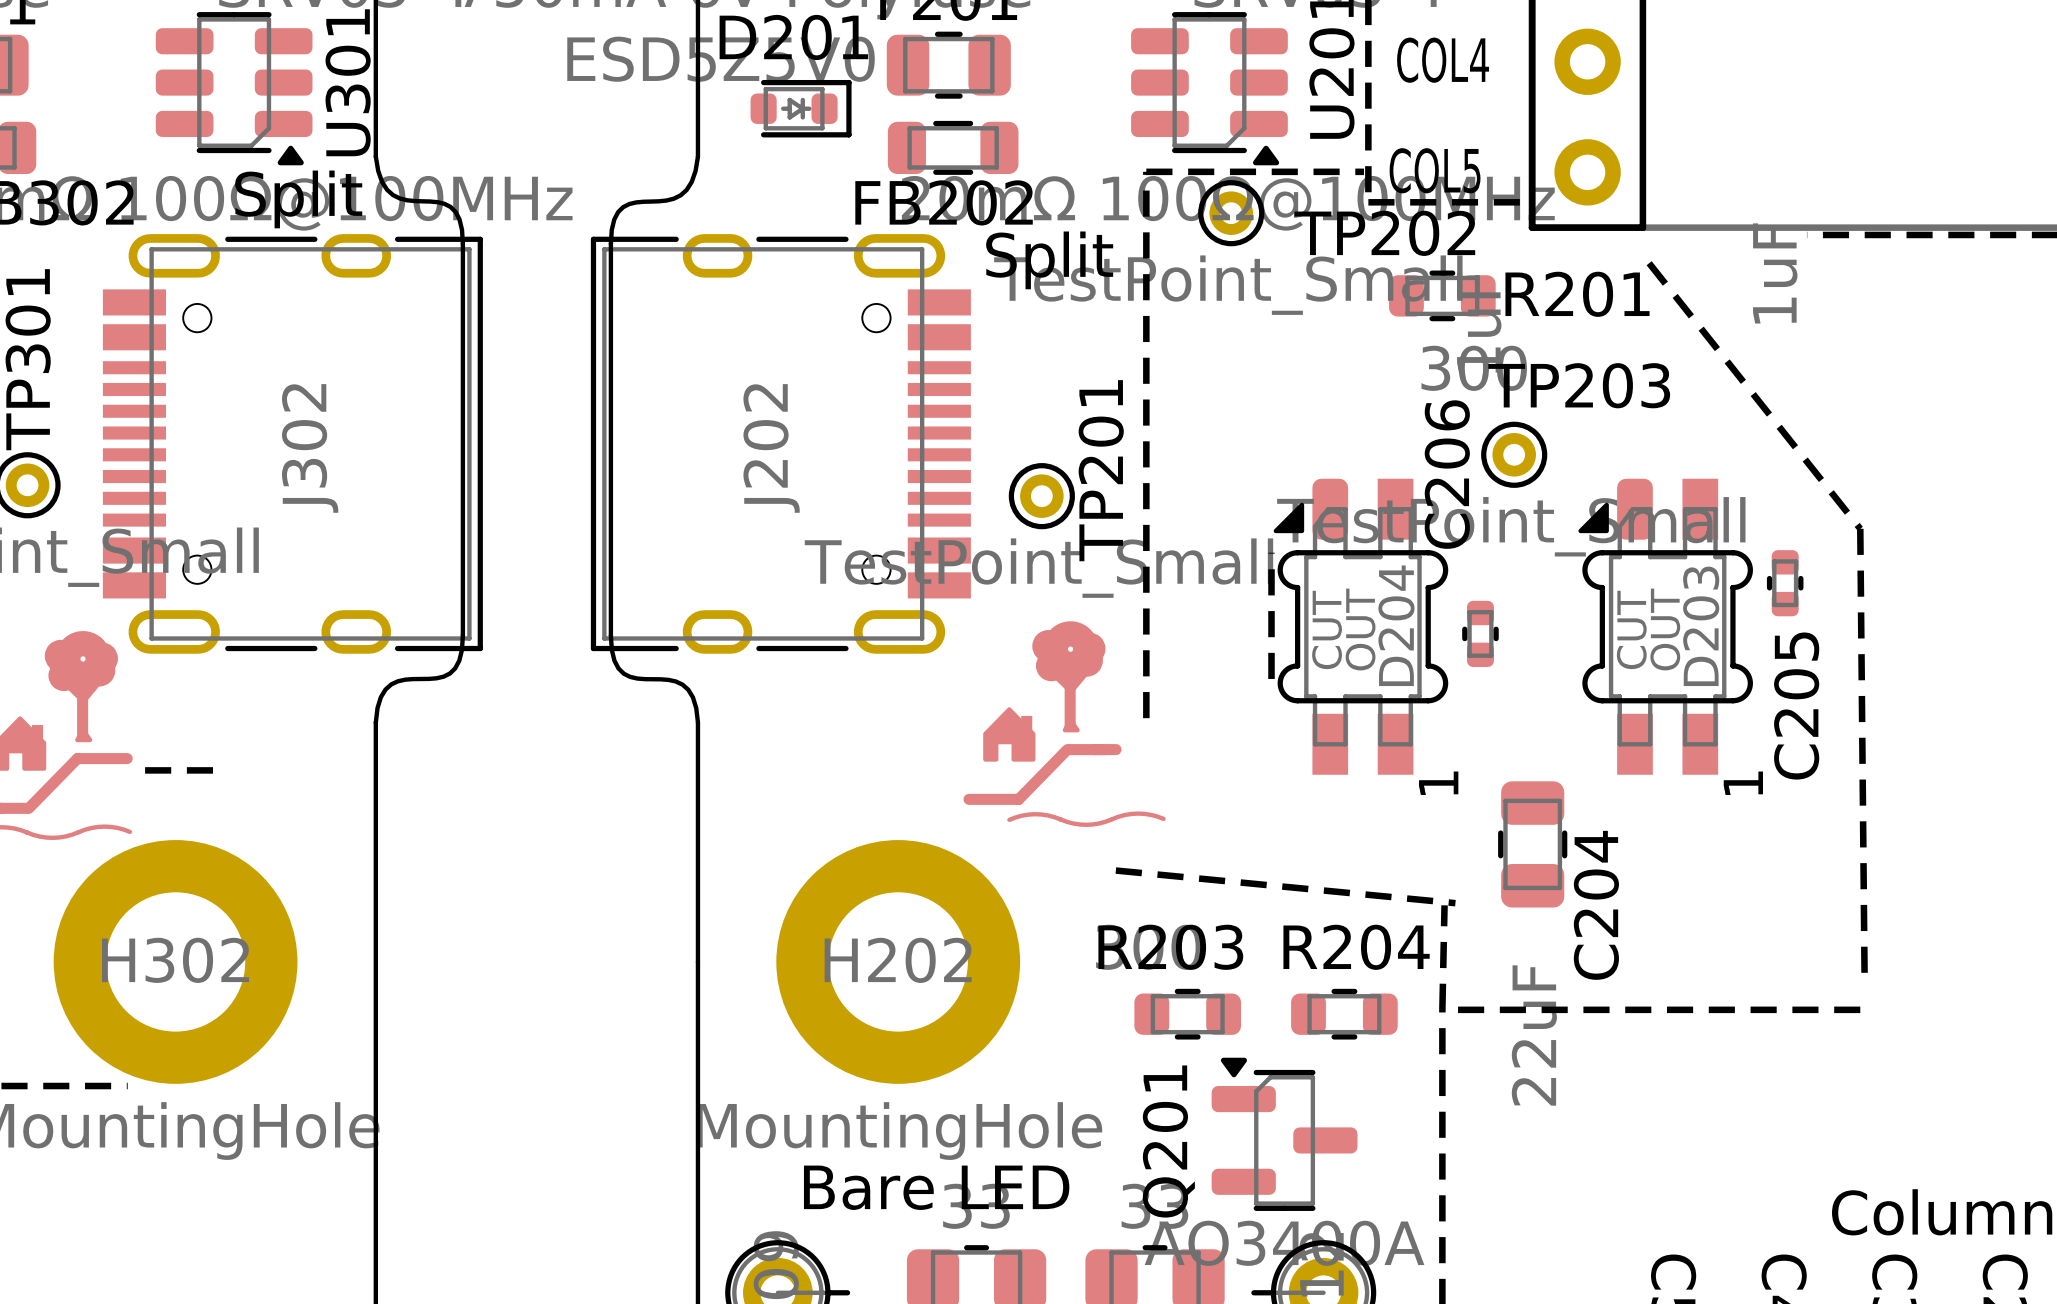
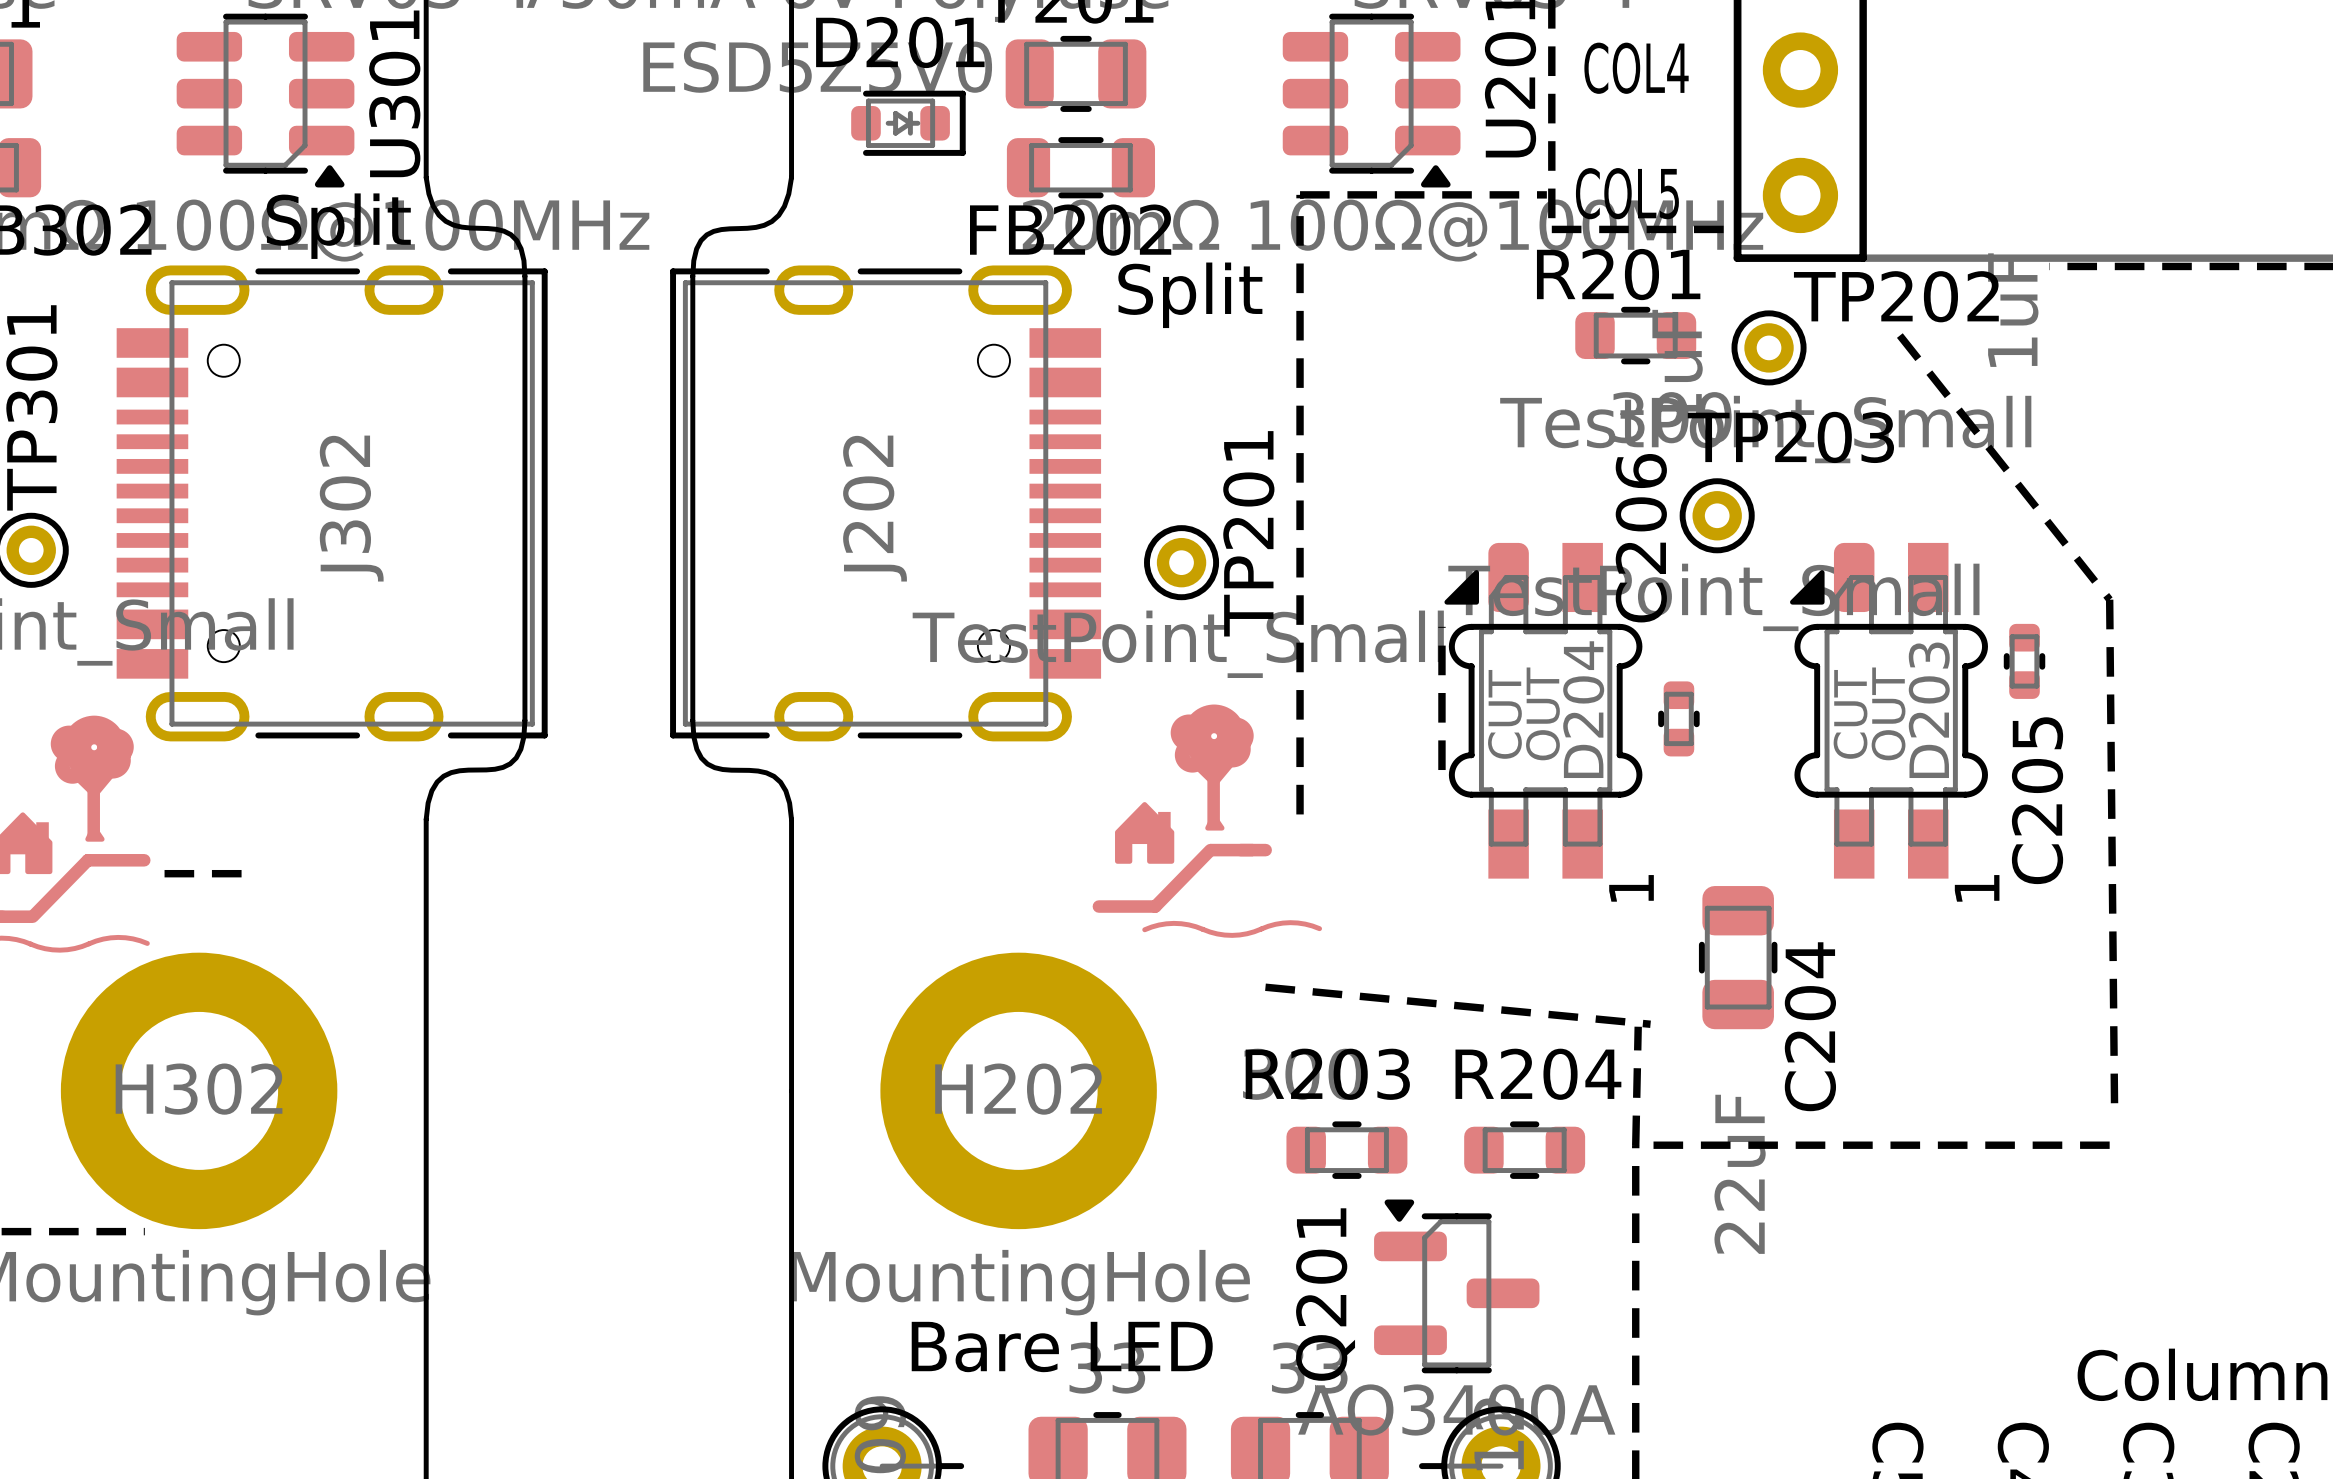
TP202 position: (1231, 213) -> (1769, 347)
TP202 name position: TP202 (1384, 233) -> TP202 (1896, 296)
line: (1649, 263) (1860, 528) -> (1899, 335) (2109, 599)
R201 name position: R201 (1577, 294) -> R201 (1618, 274)

